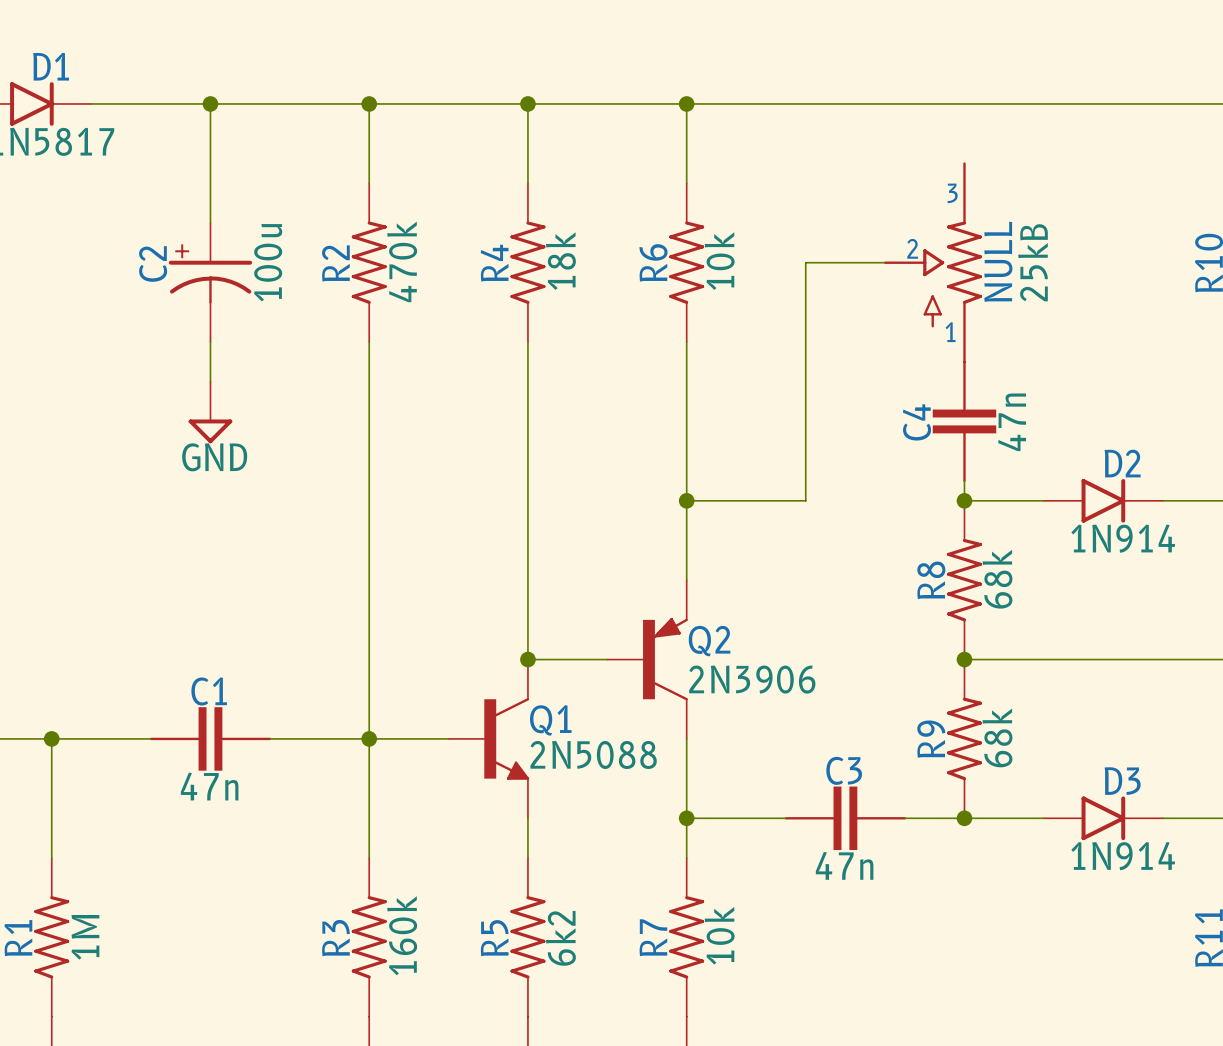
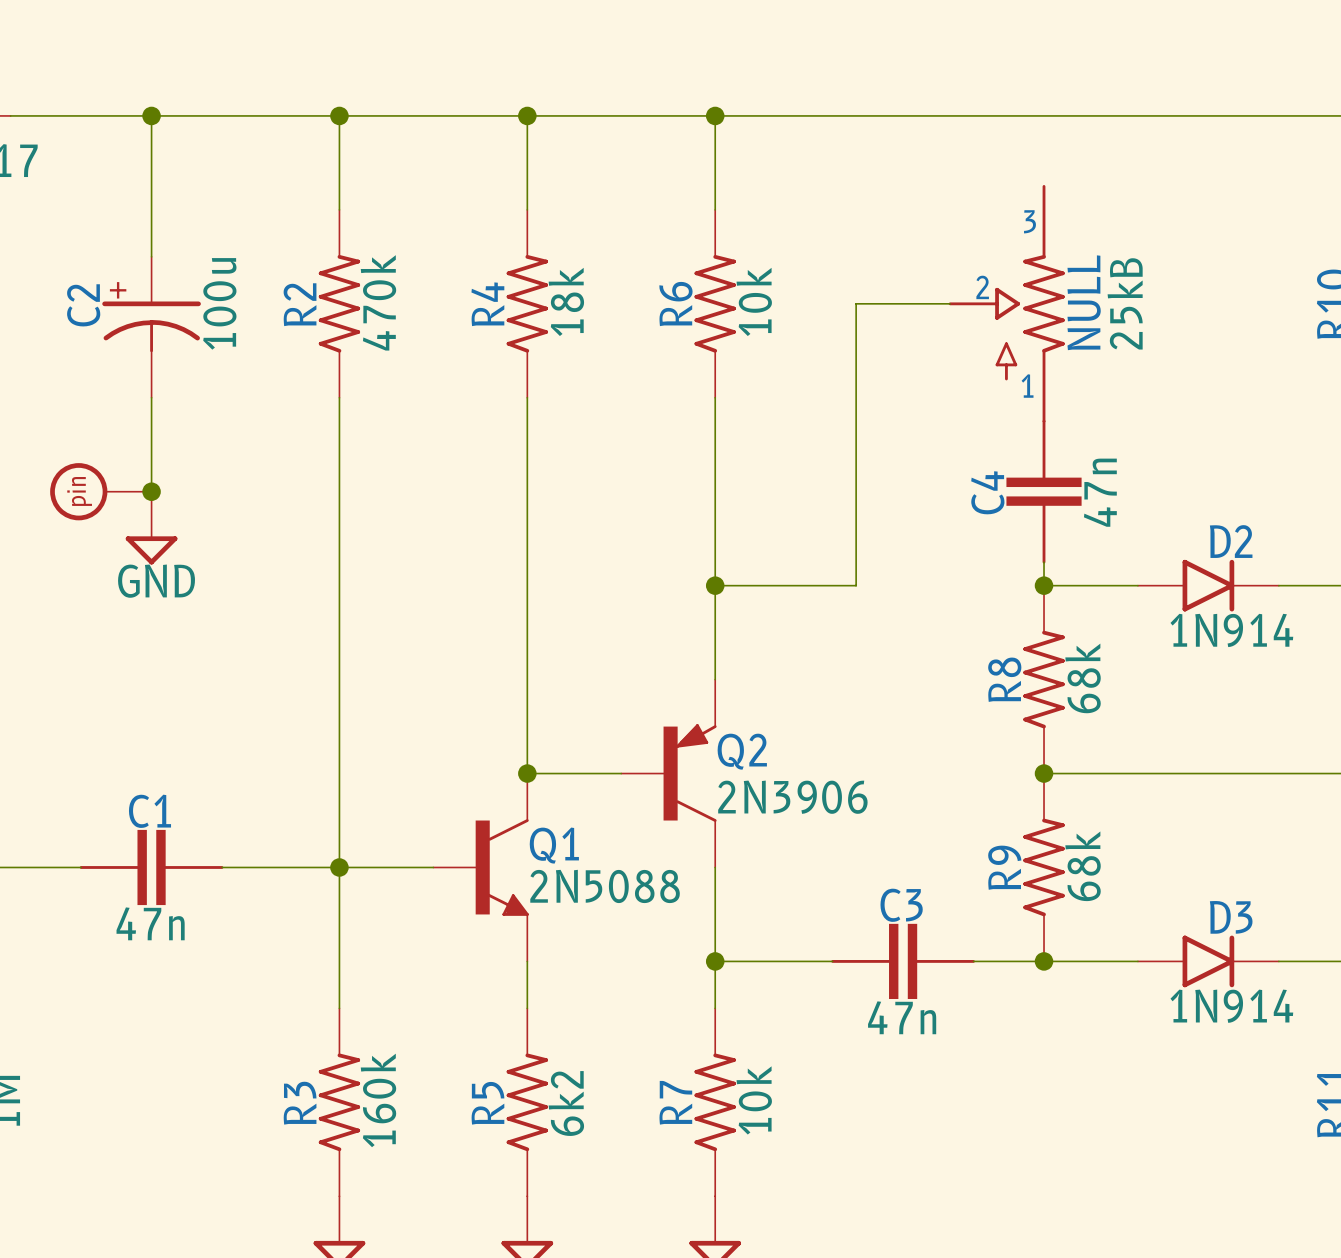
power symbol position: GND (210, 412) -> GND (151, 528)
part: none -> (100, 491)
junction: none -> (151, 491)

